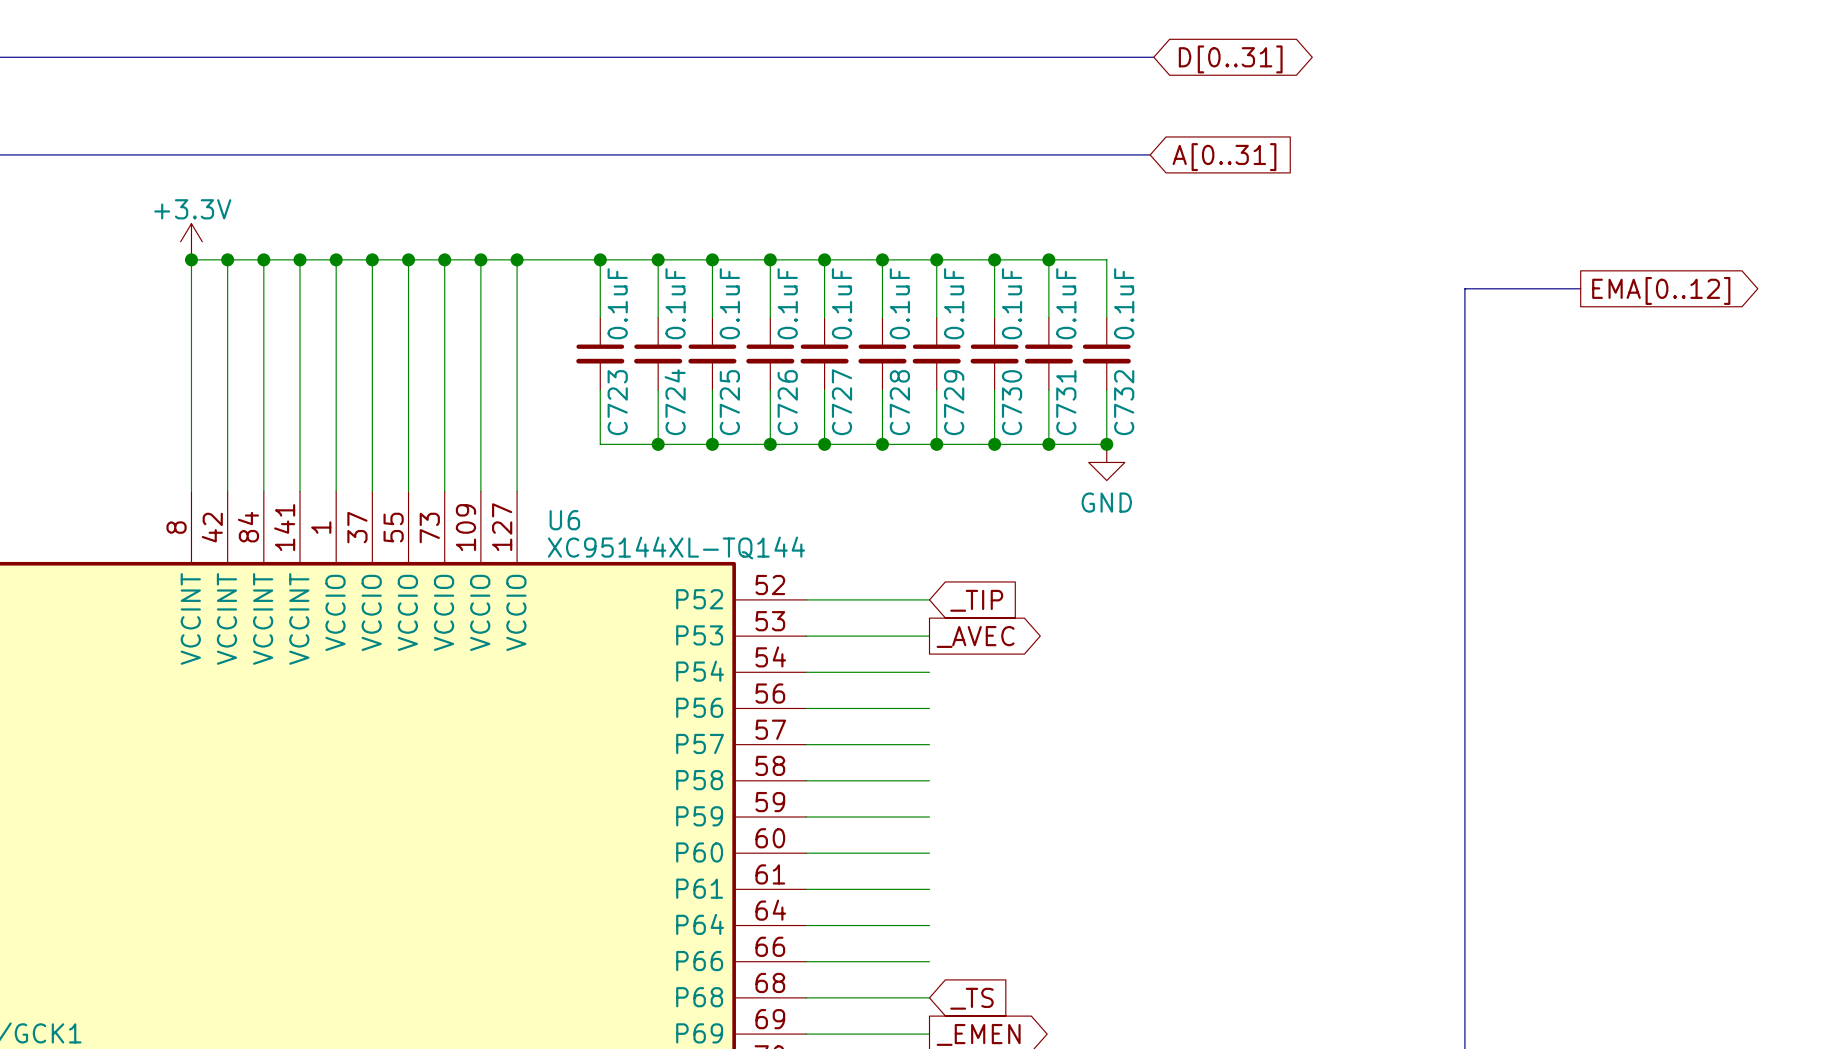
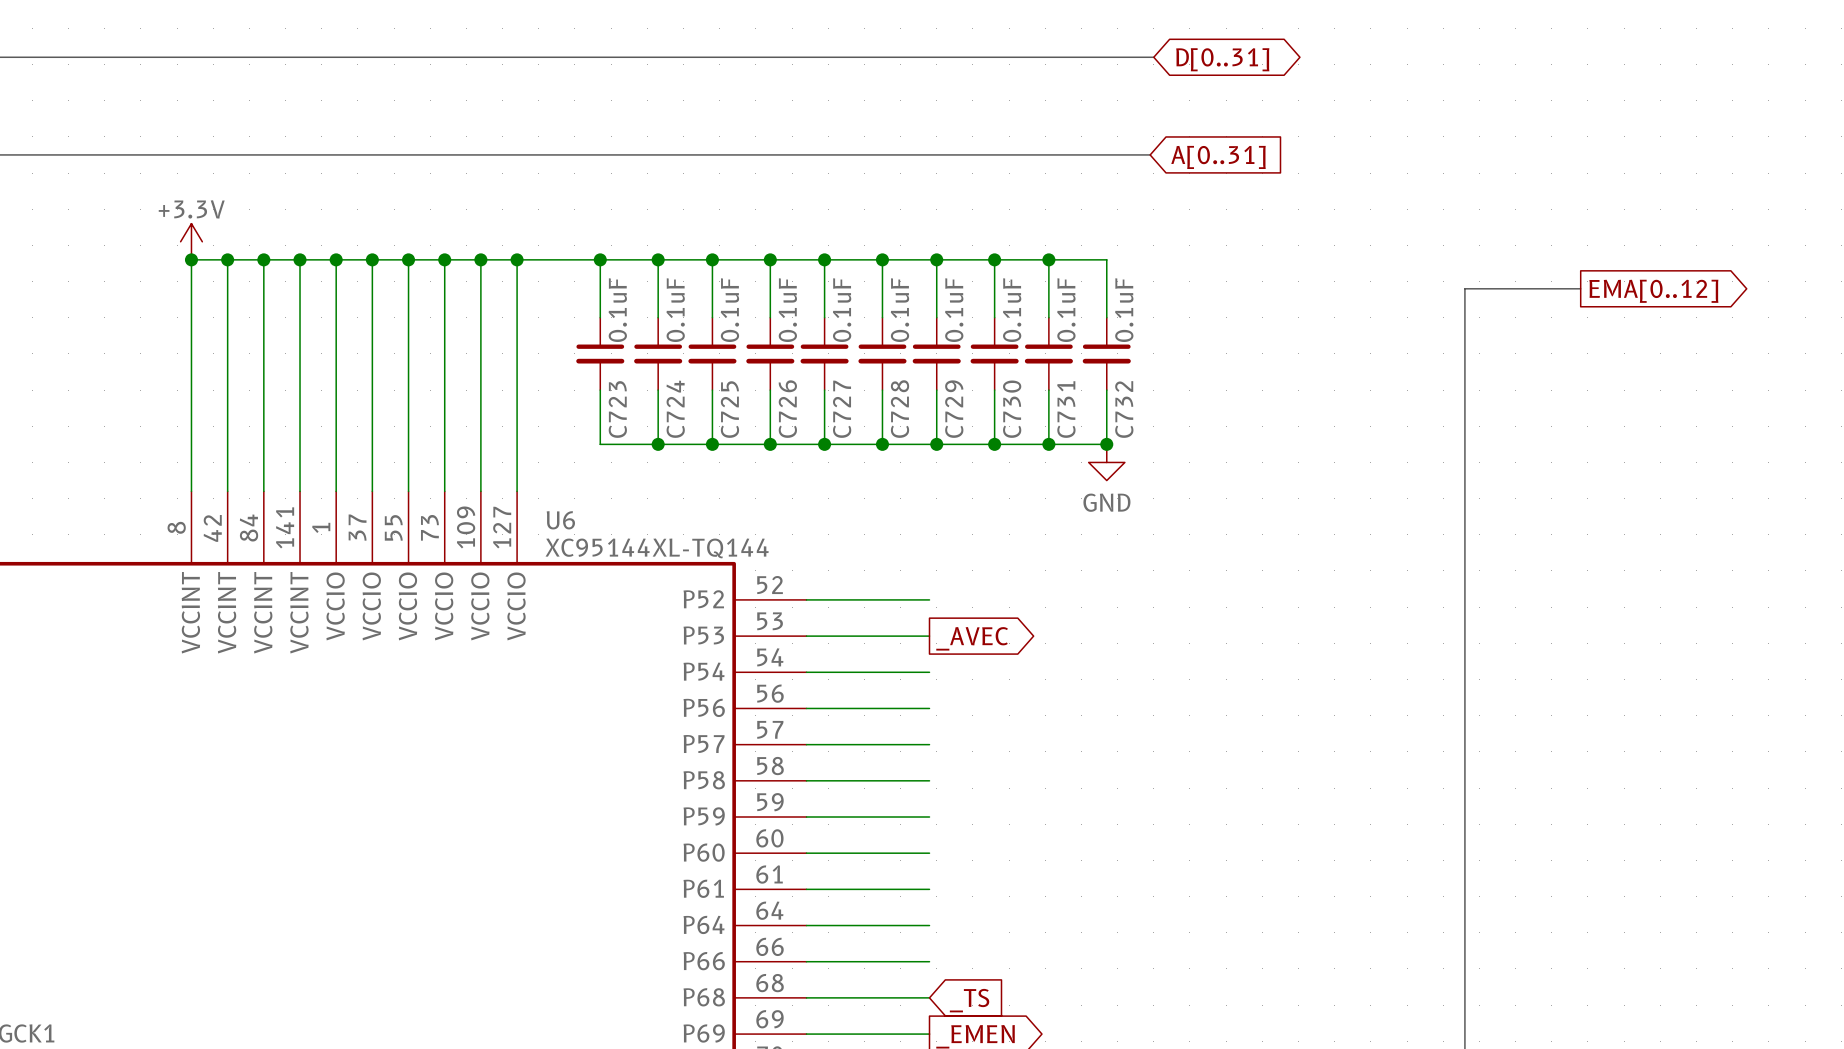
global label: _TIP (976, 600) -> none

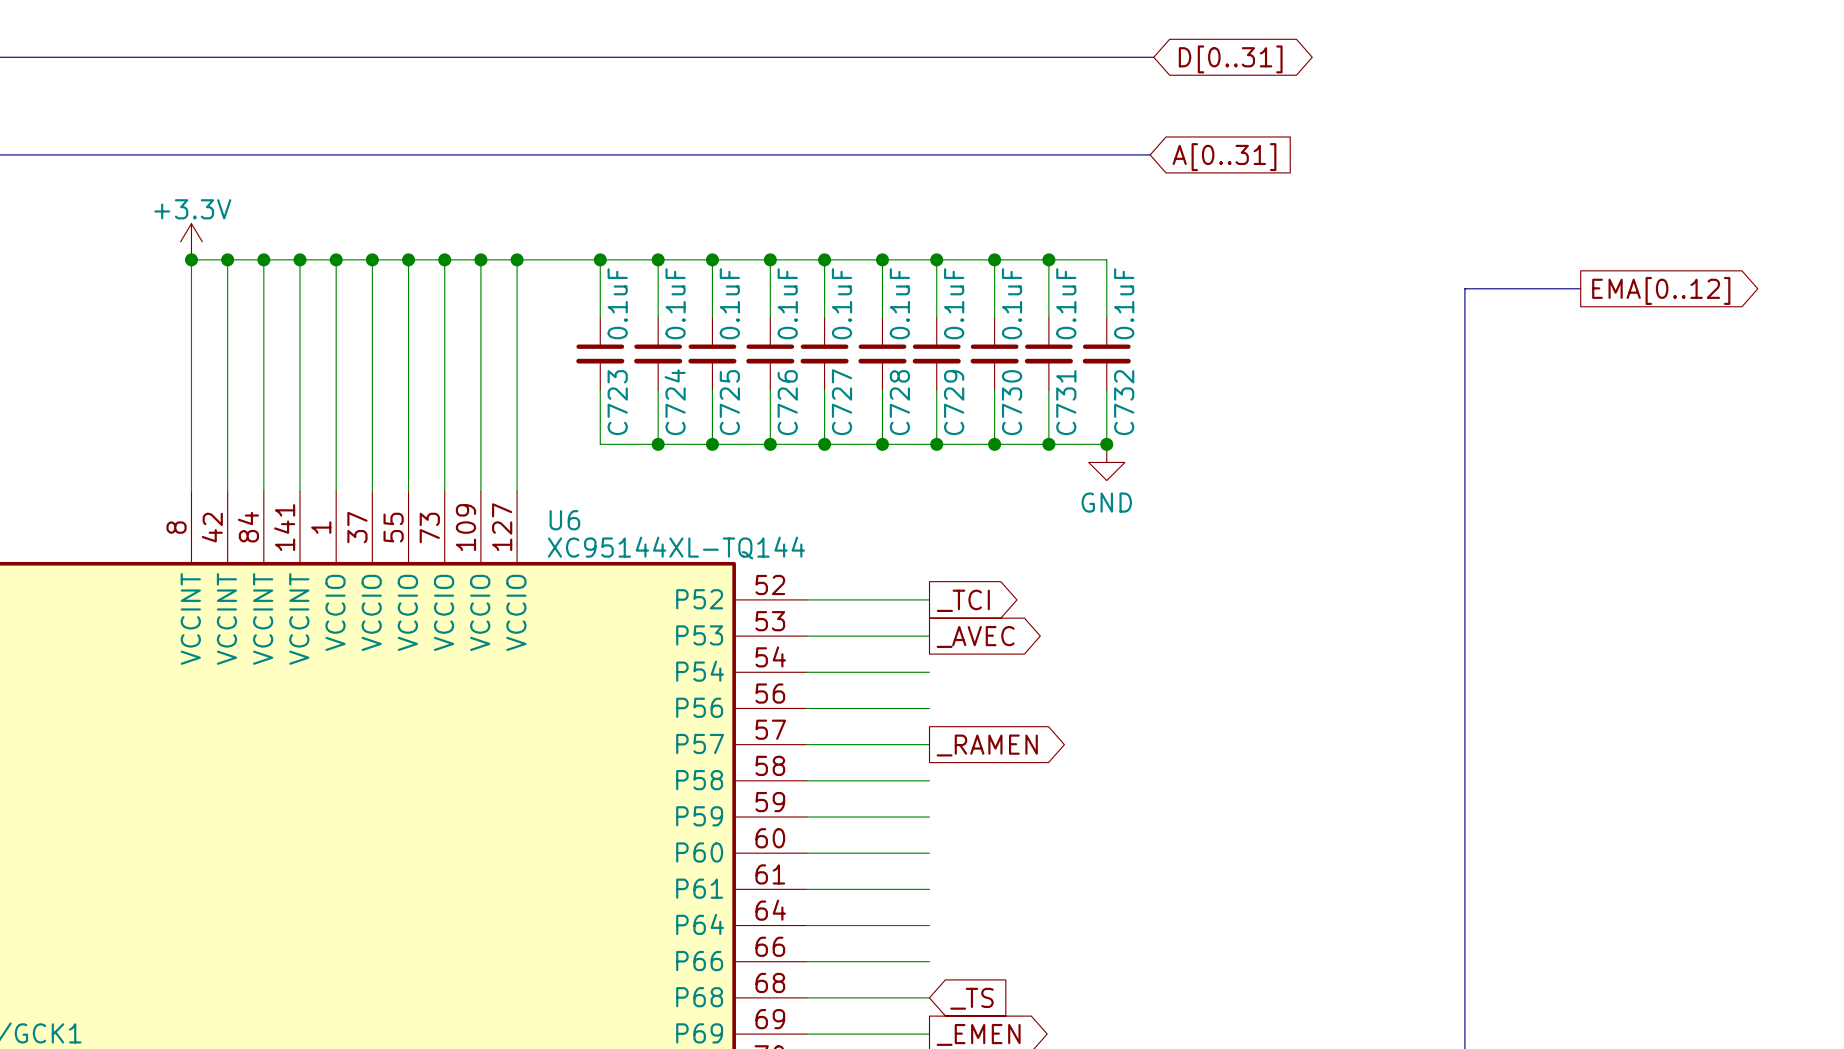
global label: none -> _TCI (963, 600)
global label: none -> _RAMEN (987, 745)

